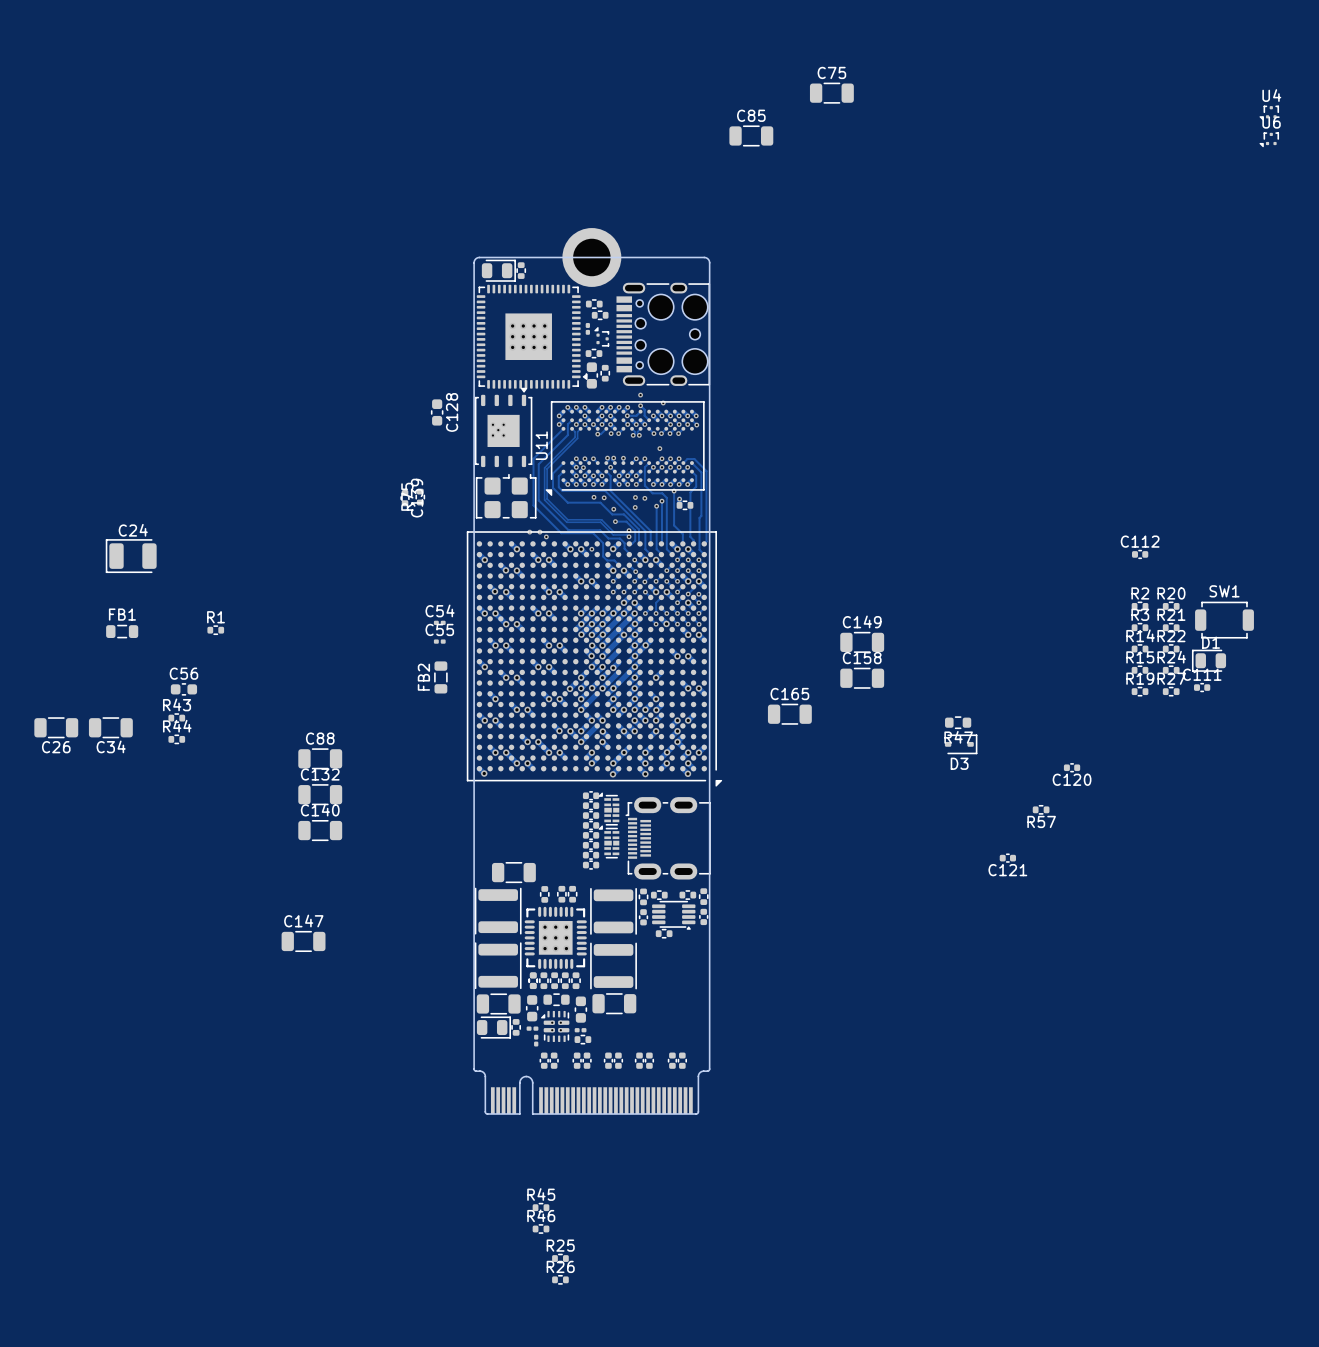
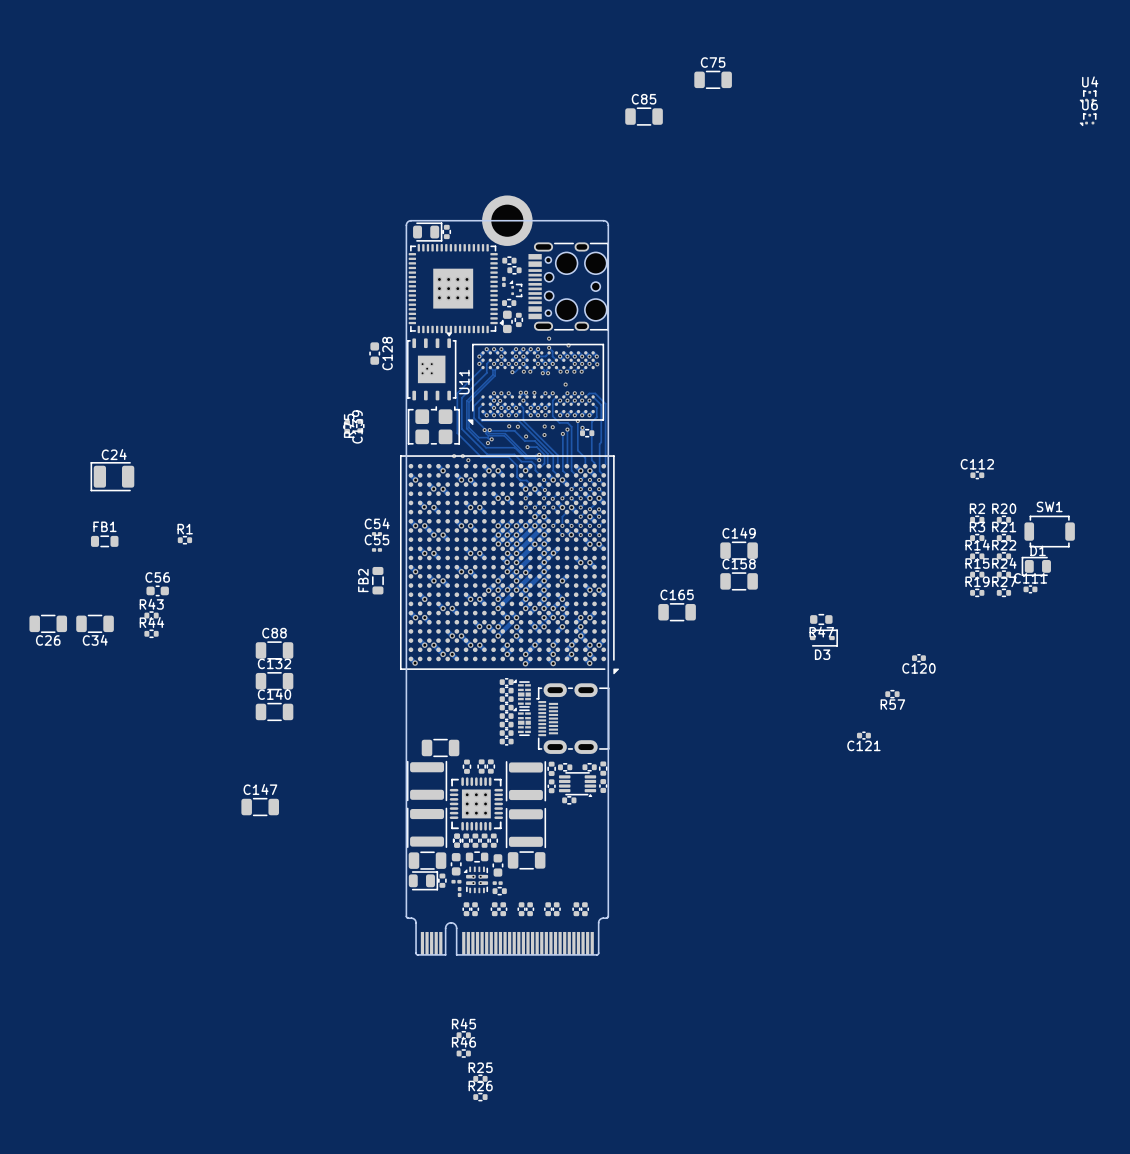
track: none -> (484, 430) (488, 435) (504, 435) (526, 458) (536, 459)
via: none -> (484, 430)
track: none -> (489, 430) (489, 433) (505, 433) (527, 455) (536, 454)
via: none -> (489, 430)
track: (558, 510) (567, 519) (601, 519) (614, 532) (627, 532) (629, 530) -> (478, 437) (491, 439)
via: none -> (491, 439)
via: none -> (487, 443)
via: (591, 549) -> none

